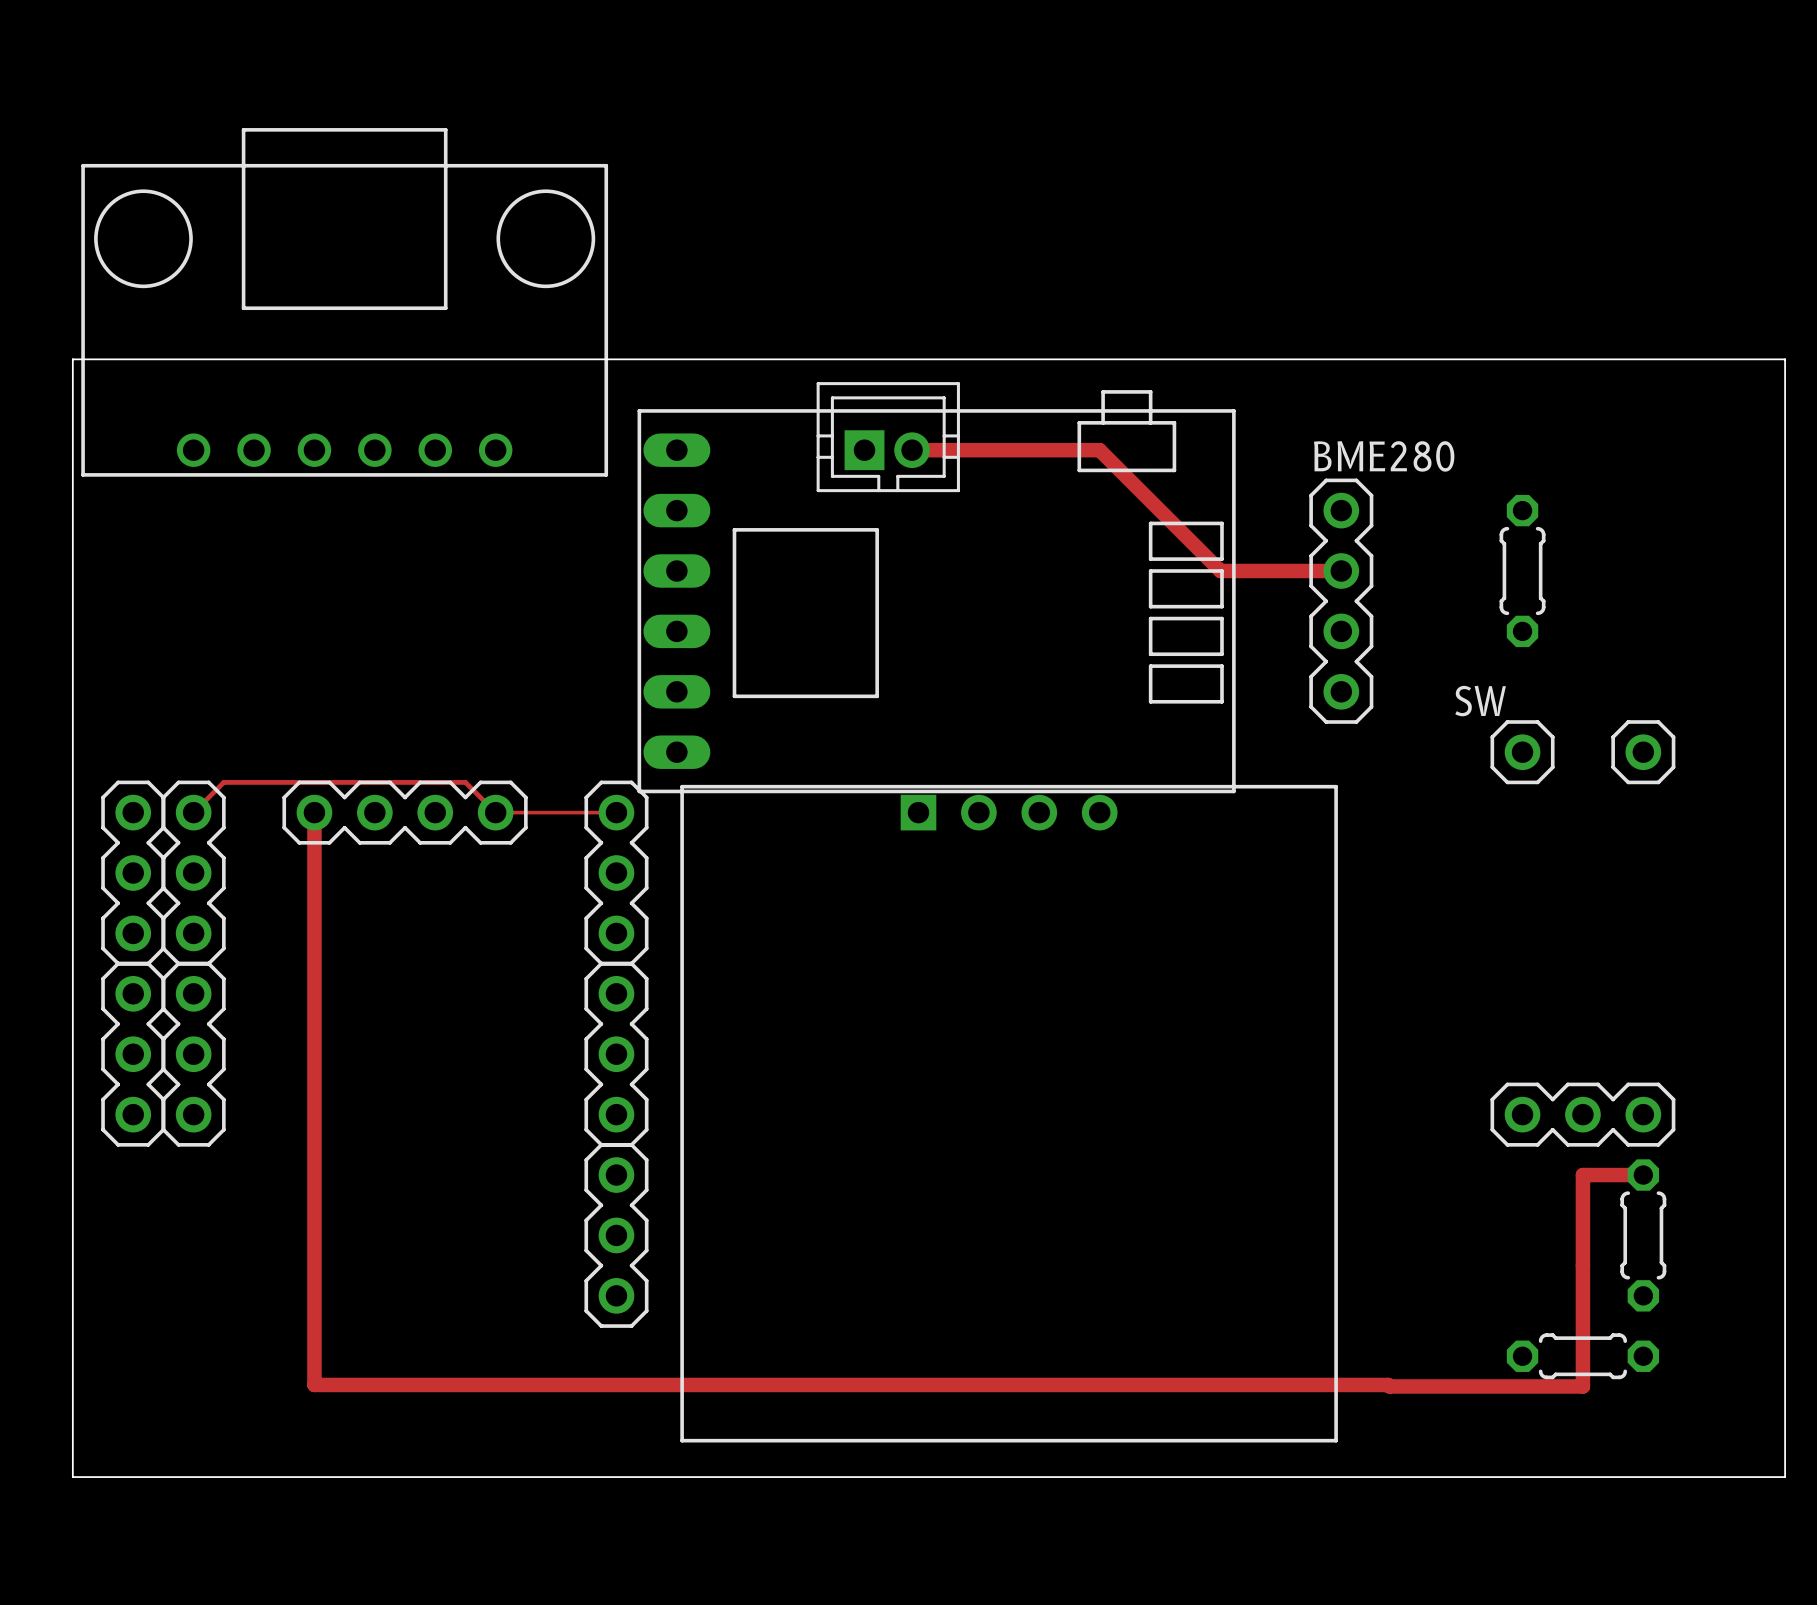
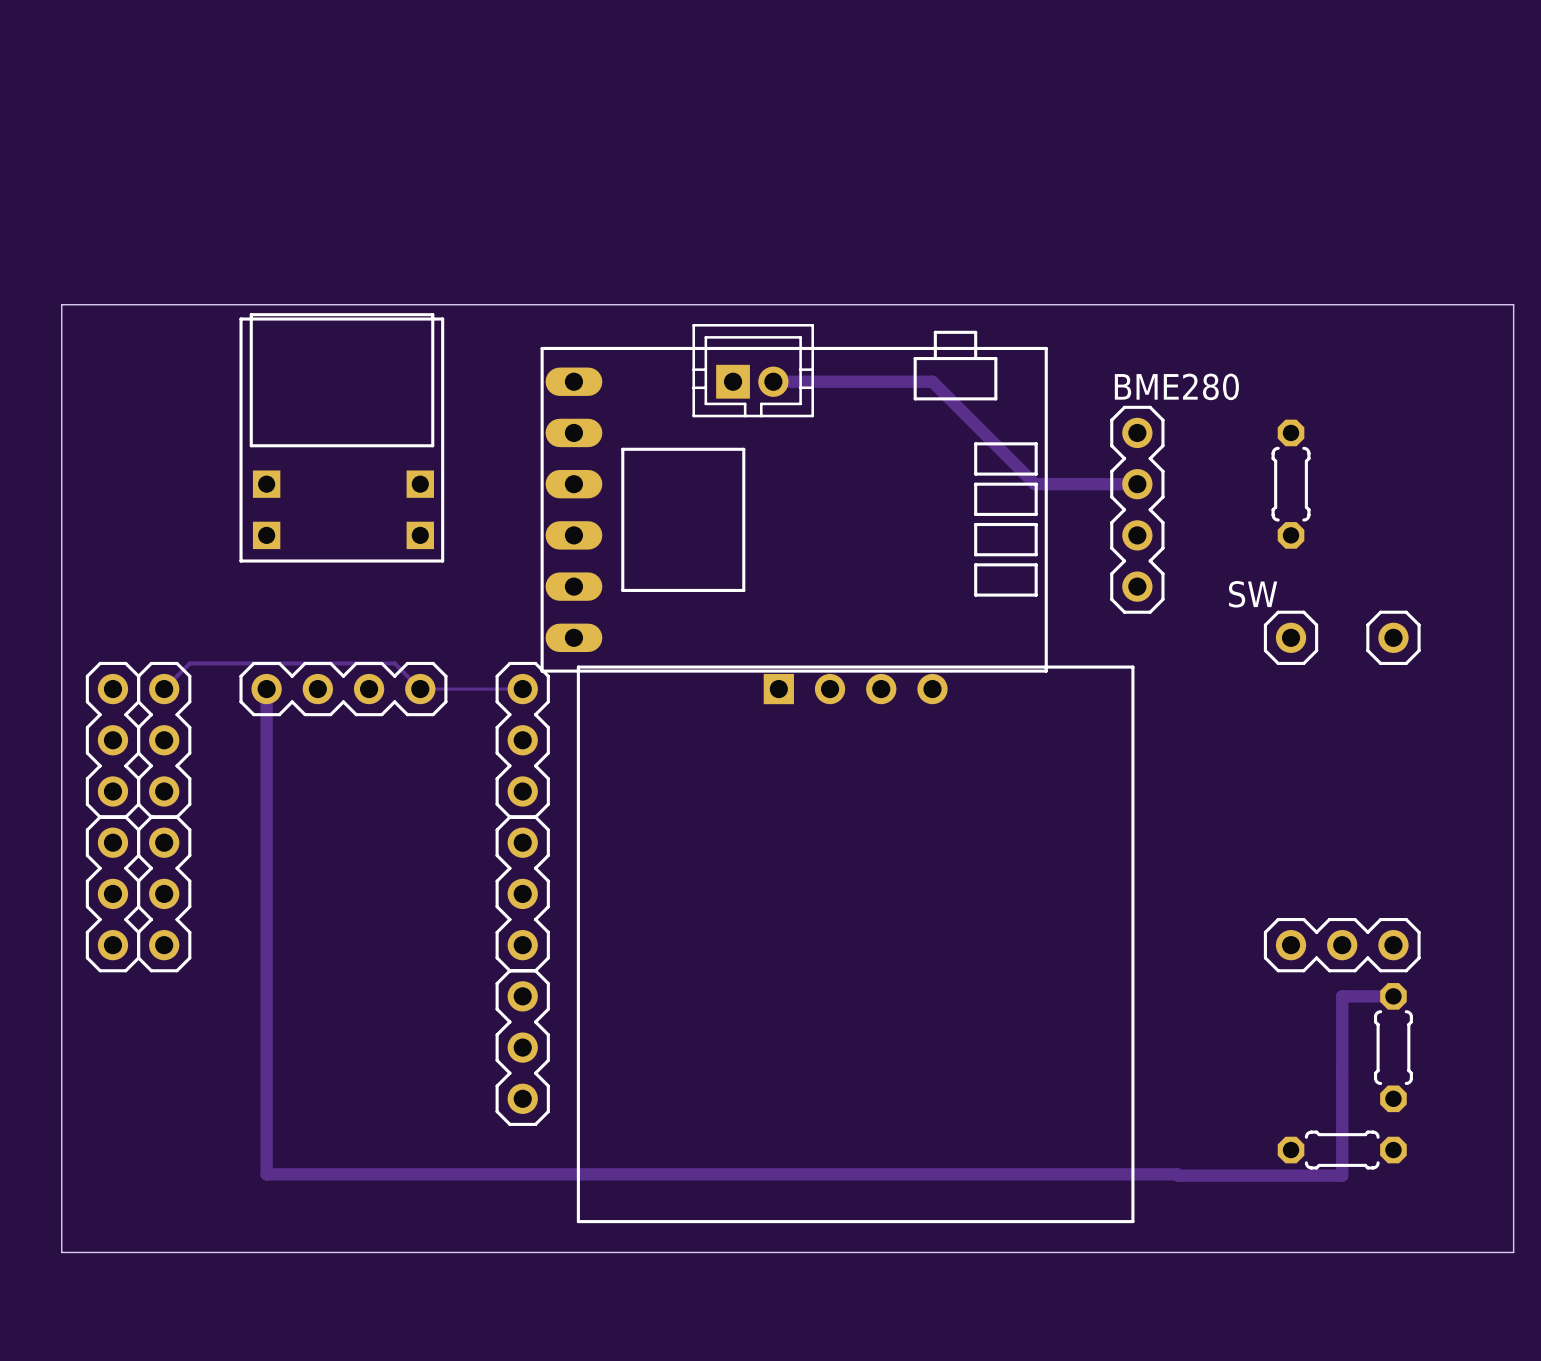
part: (344, 302) -> none
part: none -> (341, 437)

